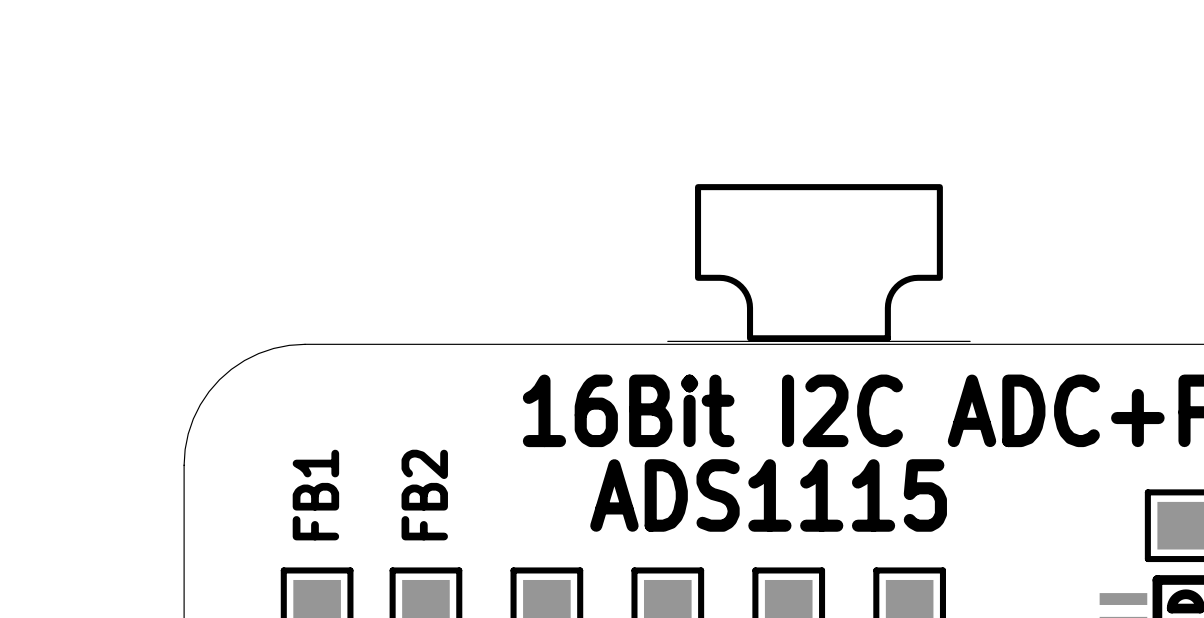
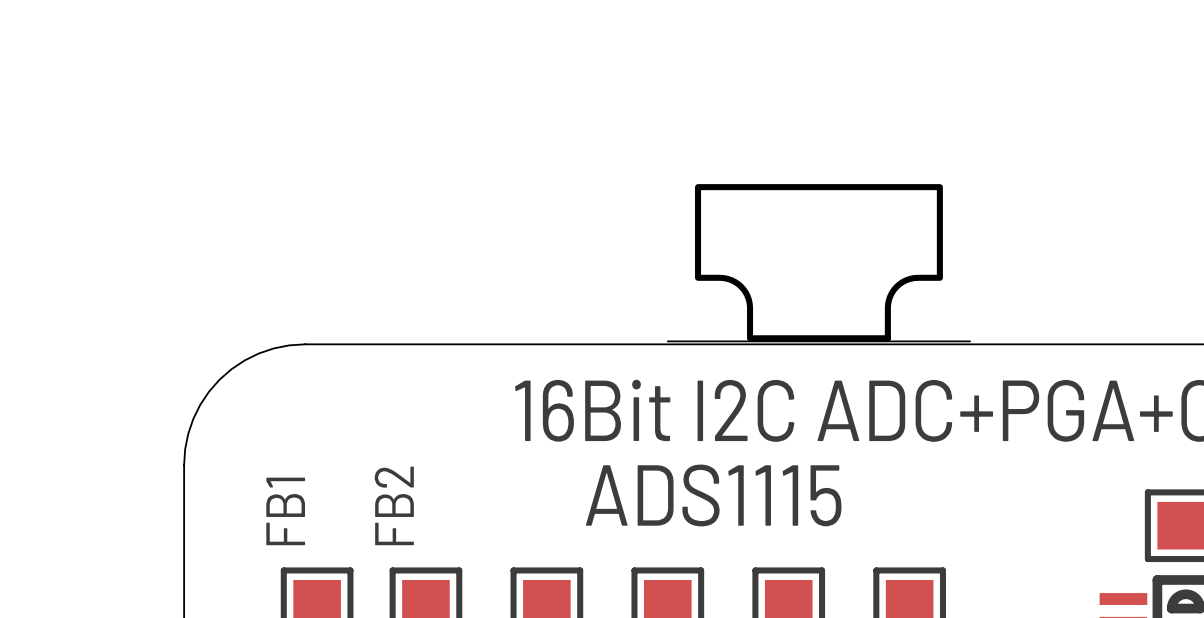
FB1 name position: FB1 (315, 495) -> FB1 (285, 511)
FB2 name position: FB2 (424, 495) -> FB2 (394, 505)

